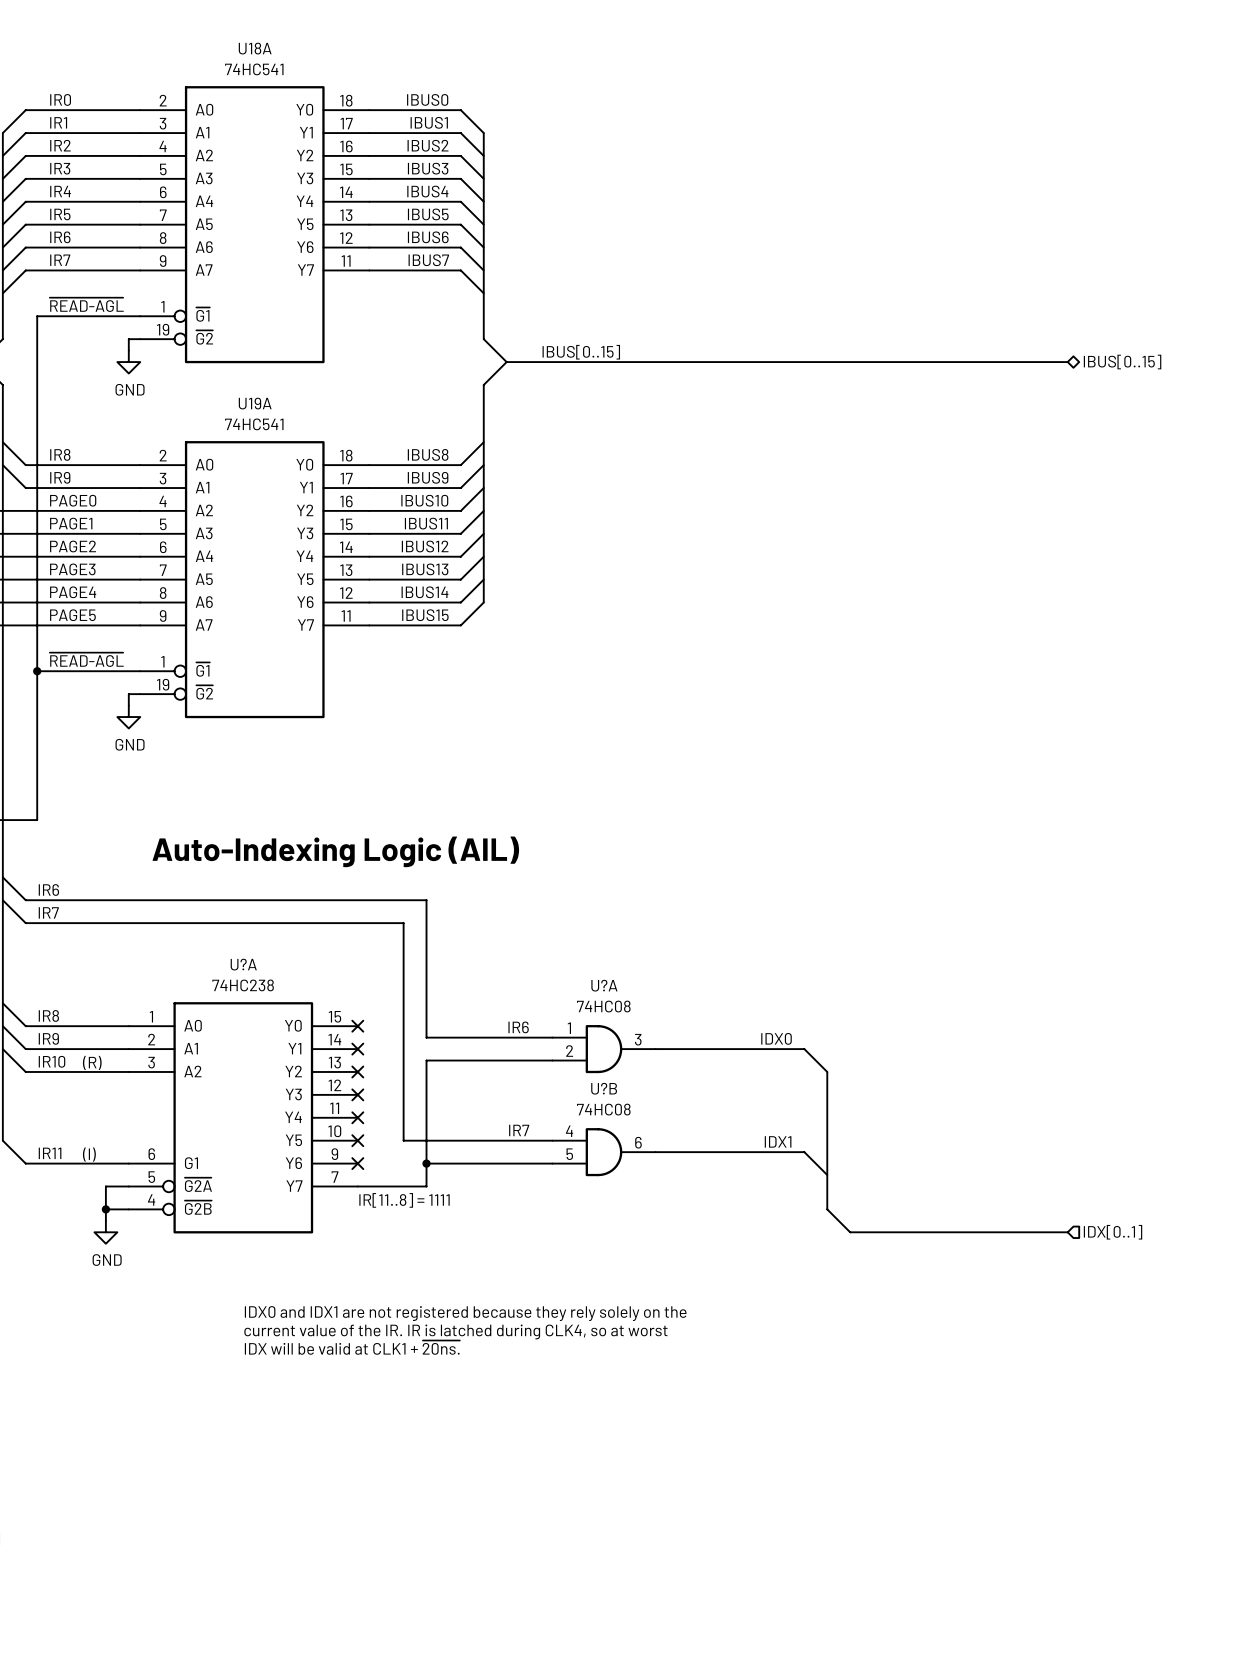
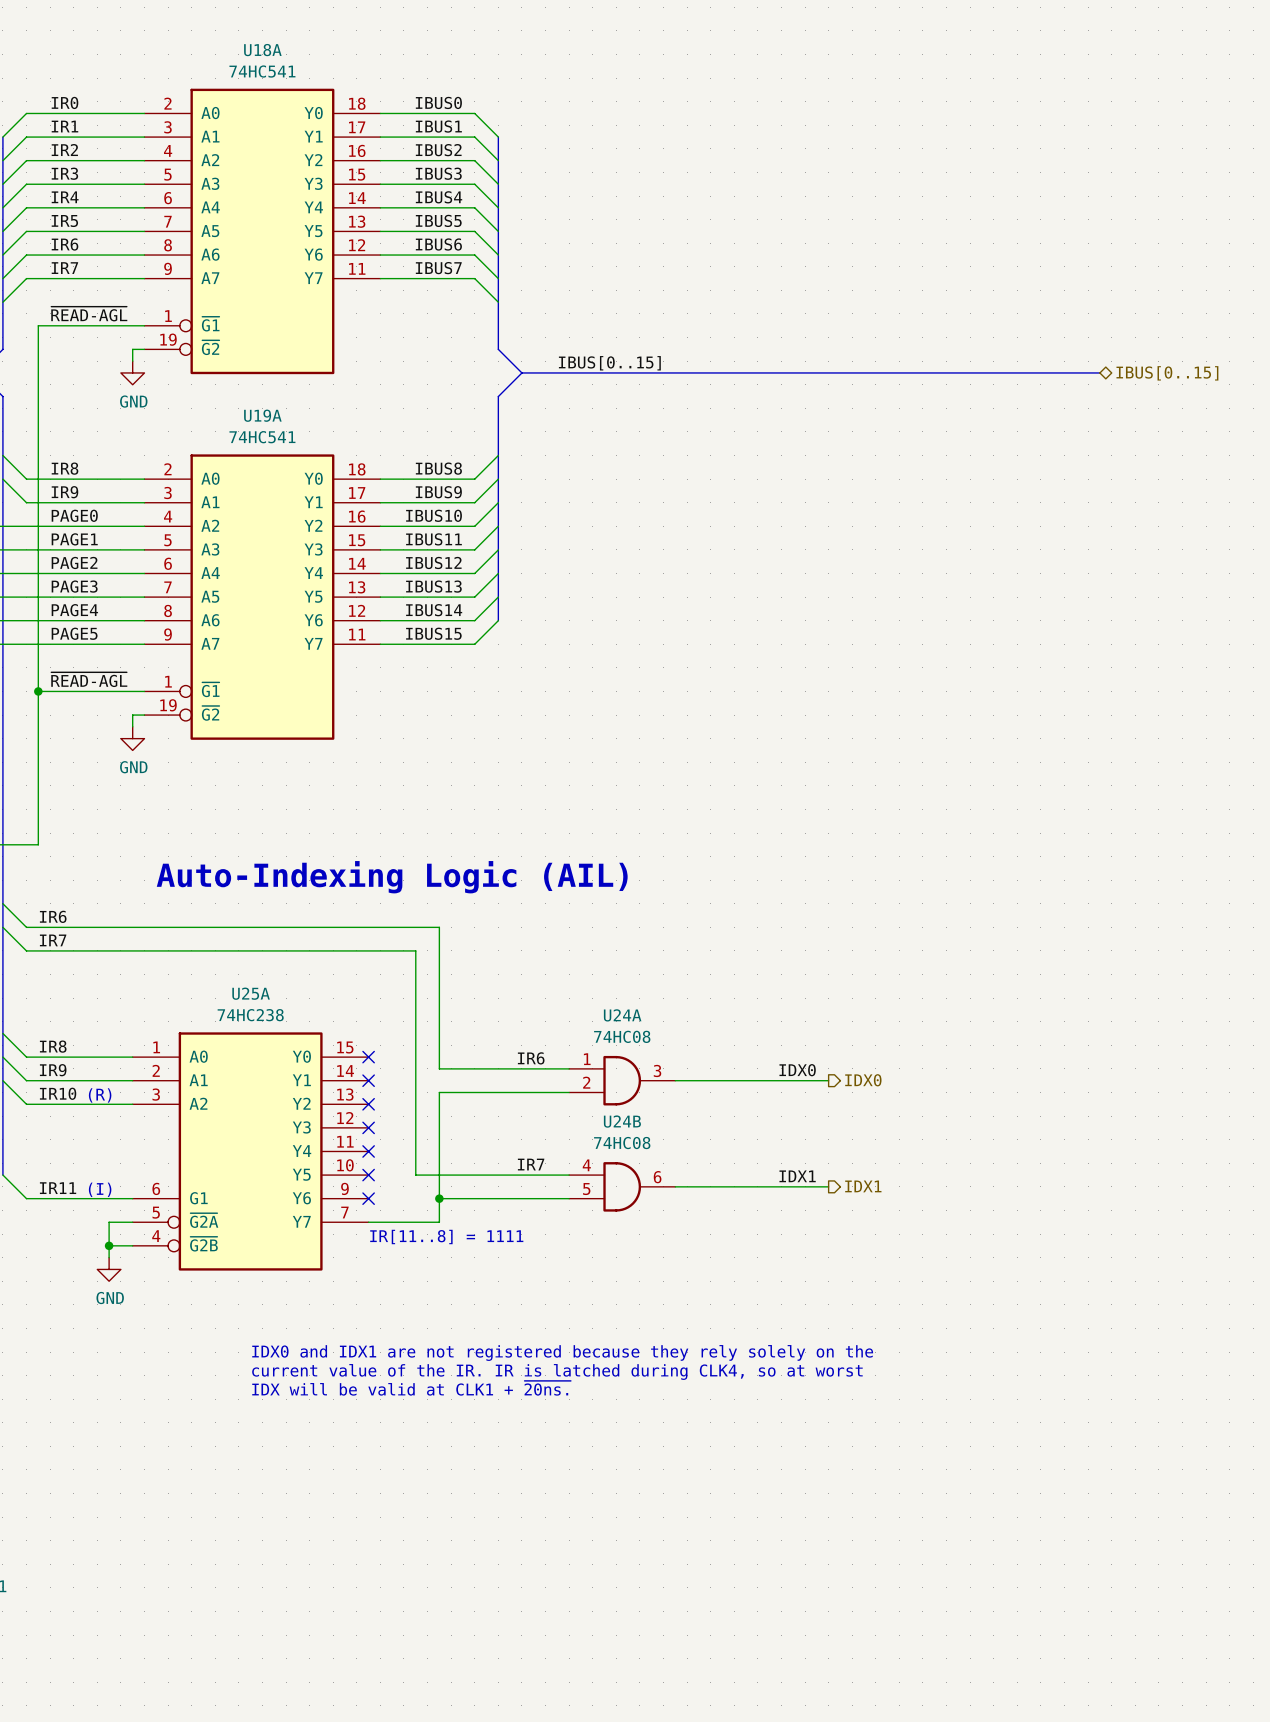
U?A name: U?A (243, 964) -> U25A (251, 993)
U?A name: U?A (604, 985) -> U24A (622, 1015)
hierarchical label: none -> IDX0 (863, 1080)
wire: (804, 1049) (827, 1071) -> none
bus: (827, 1071) (827, 1209) (850, 1232) (1067, 1232) -> none
U?B name: U?B (604, 1088) -> U24B (622, 1121)
hierarchical label: none -> IDX1 (863, 1186)
wire: (804, 1152) (827, 1175) -> none
hierarchical label: IDX[0..1] (1113, 1232) -> none

